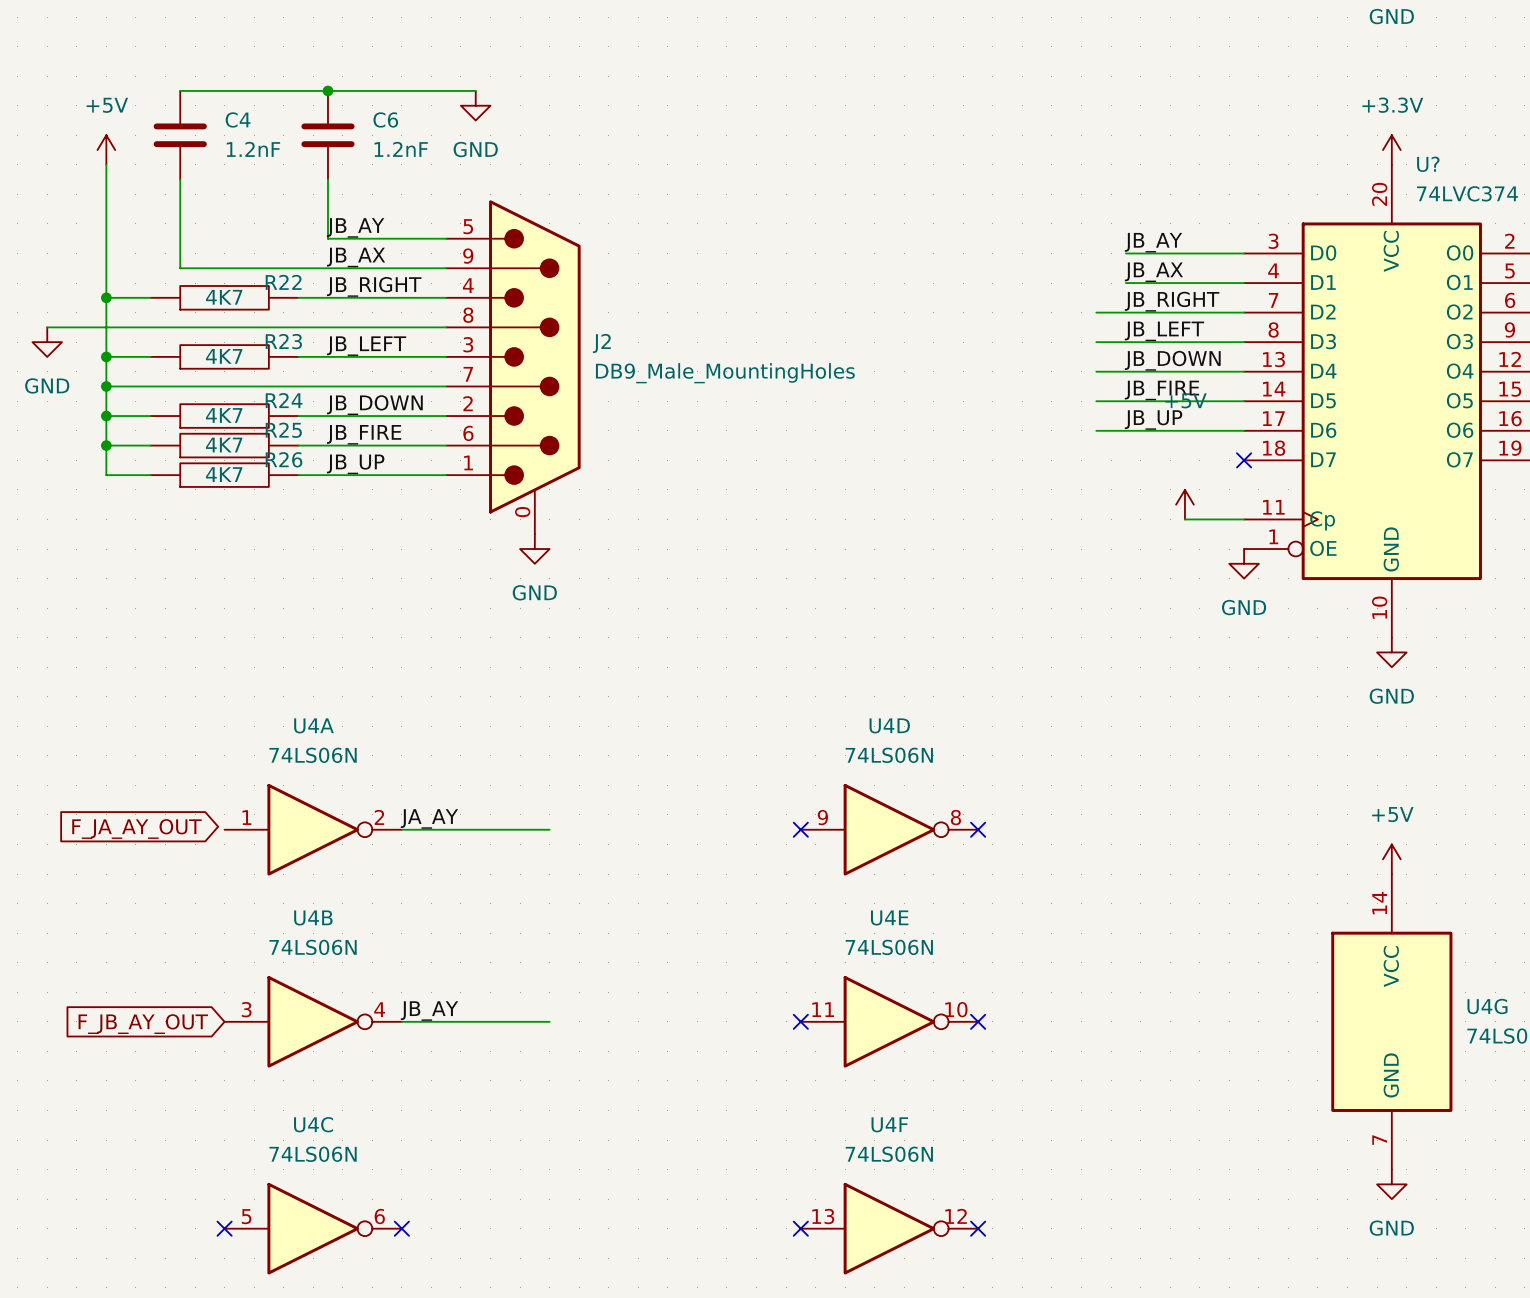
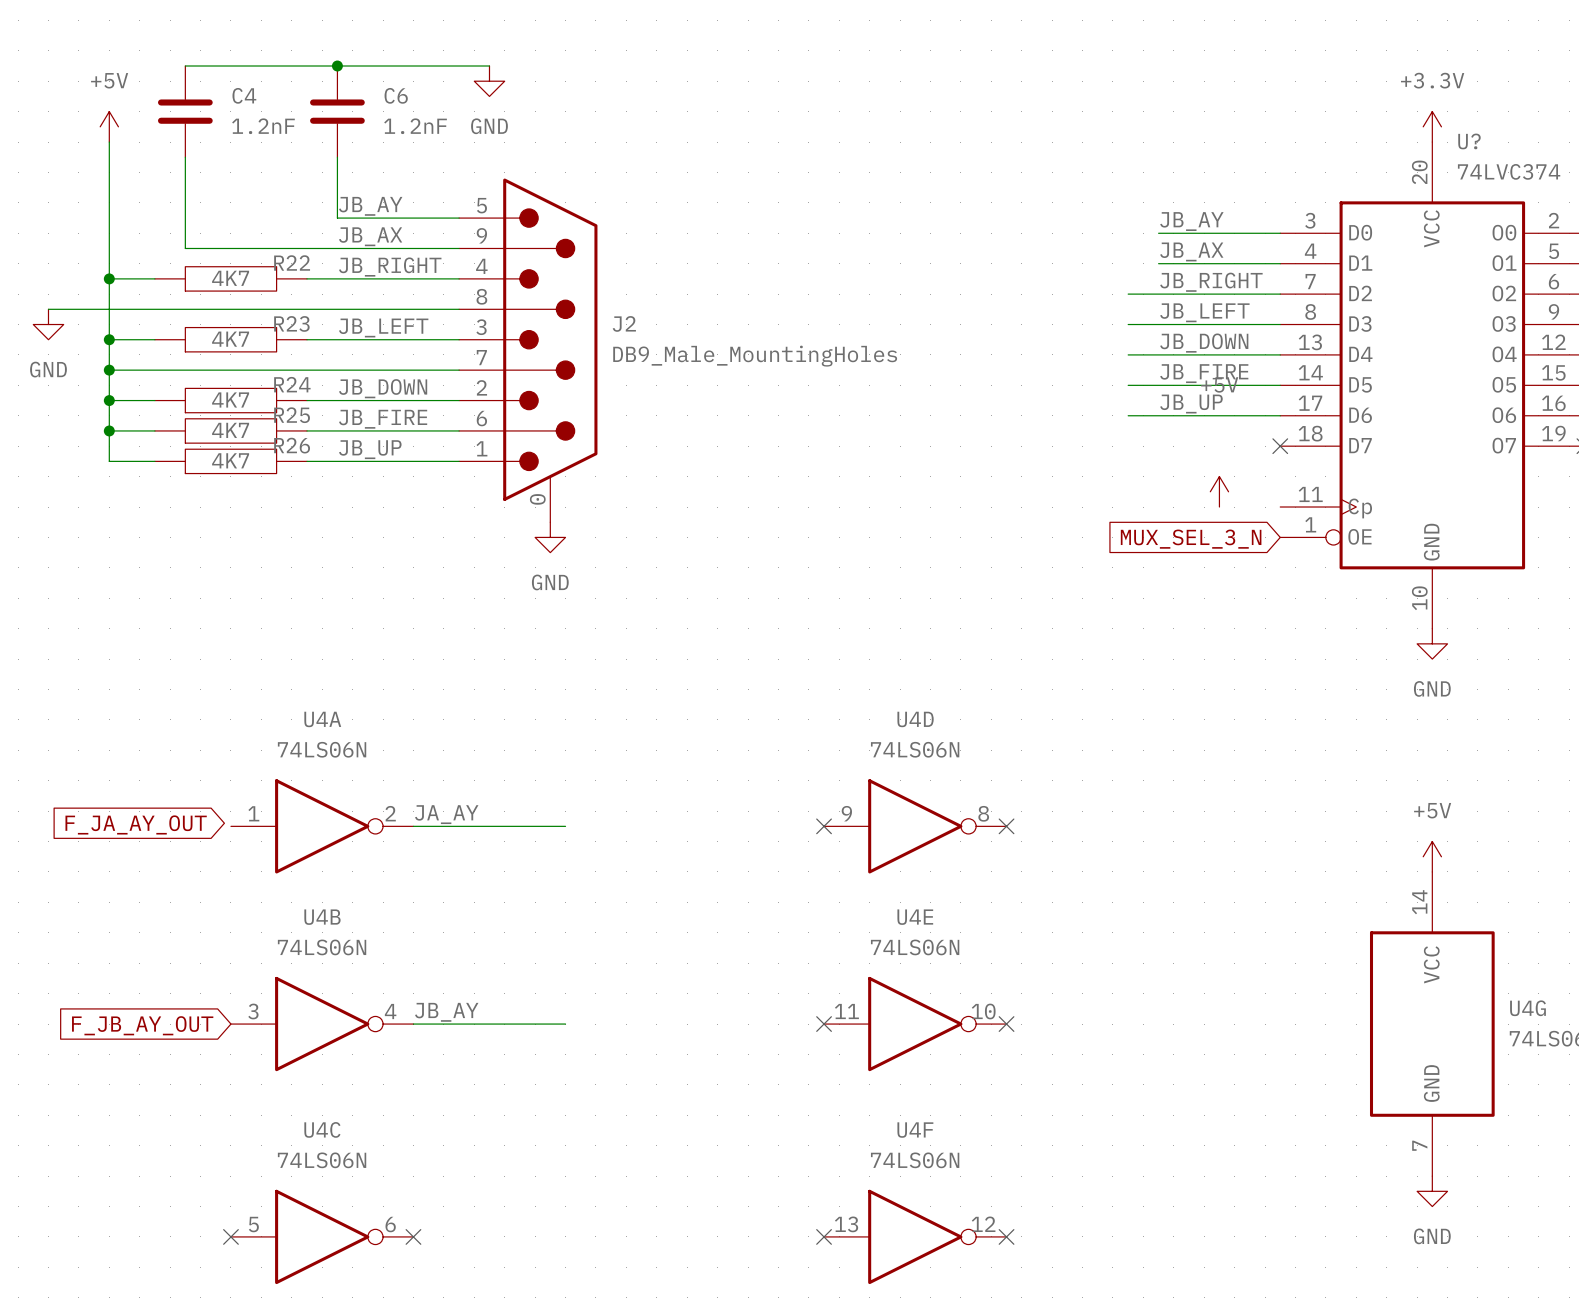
wire: (1184, 519) (1244, 519) -> none
global label: none -> MUX_SEL_3_N (1191, 539)
power symbol: GND (1244, 563) -> none

